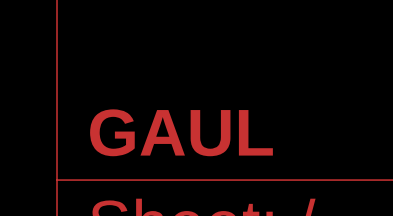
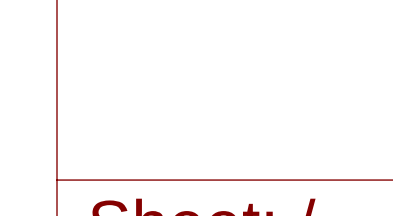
title block: GAUL (181, 132) -> none

